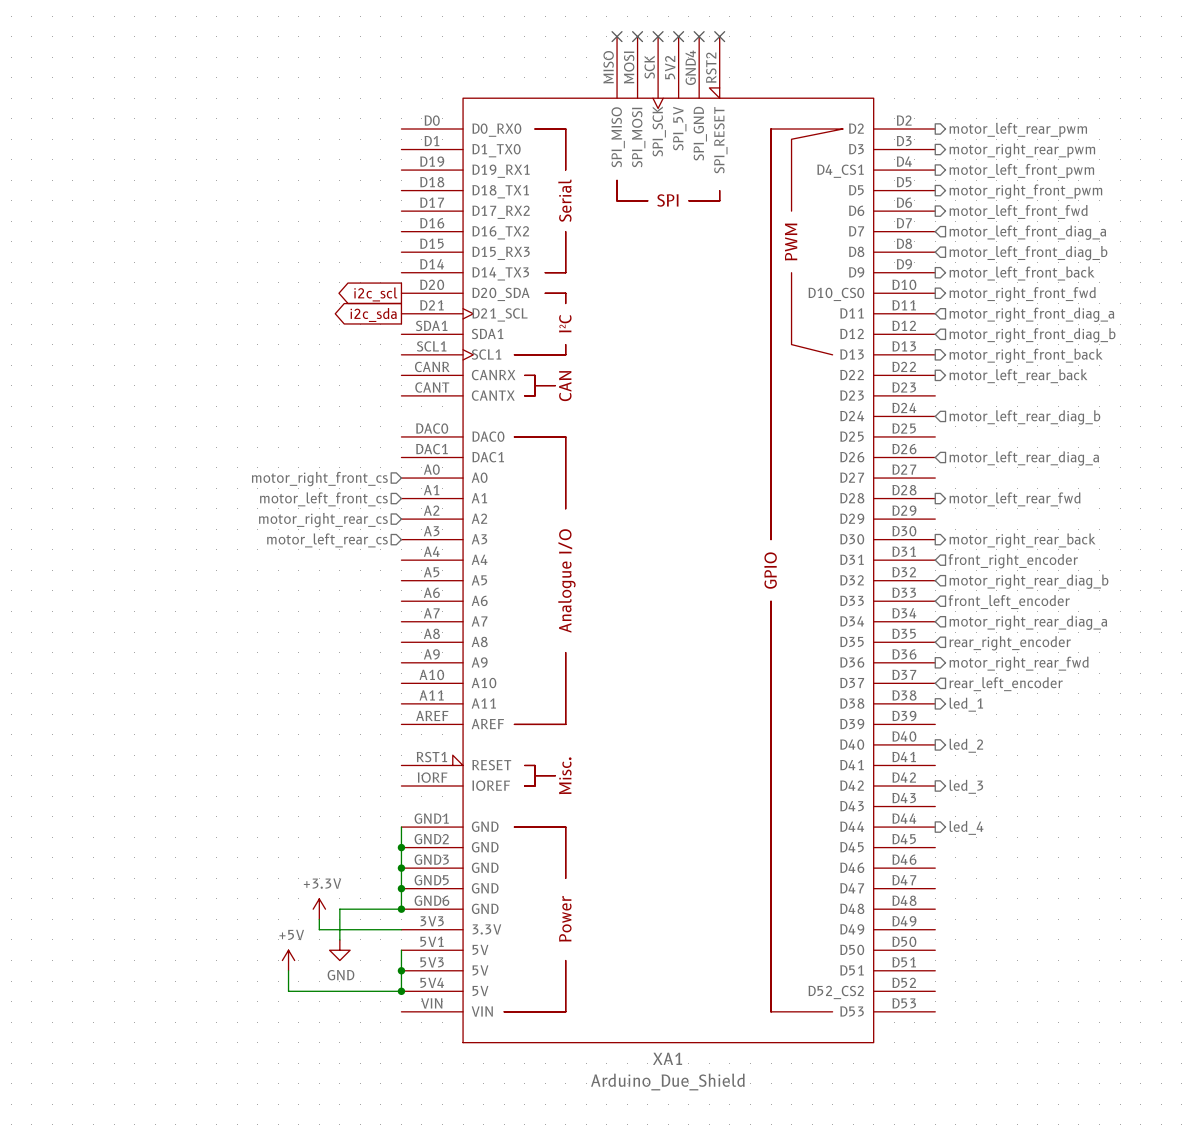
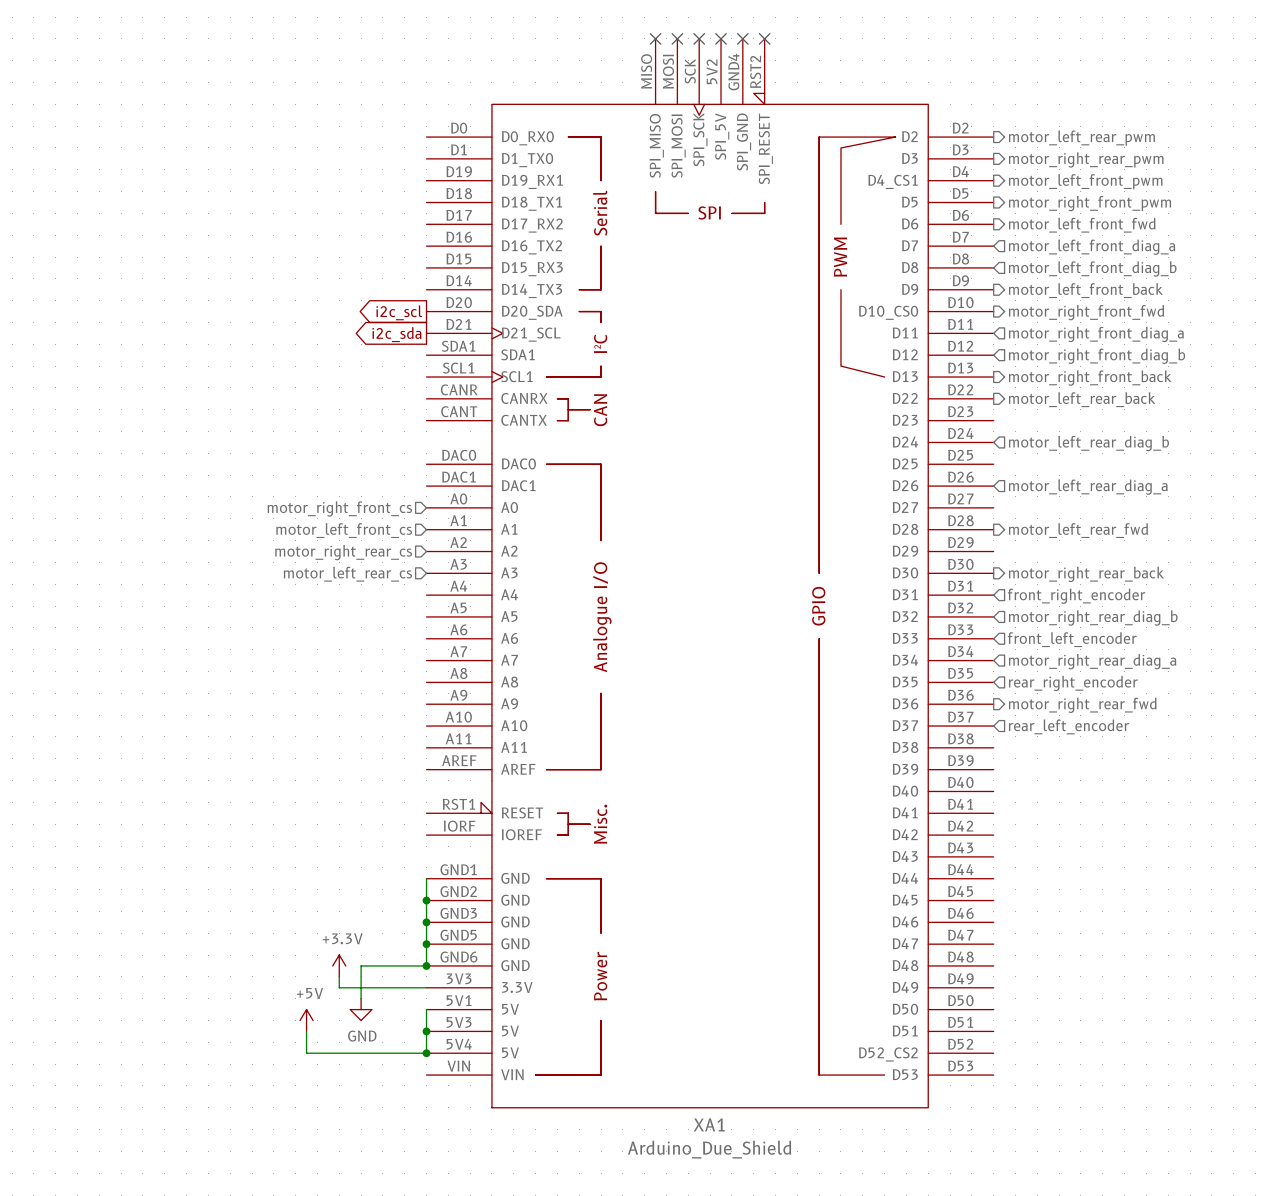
hierarchical label: led_1 (966, 704) -> none
hierarchical label: led_2 (966, 745) -> none
hierarchical label: led_3 (966, 786) -> none
hierarchical label: led_4 (966, 827) -> none

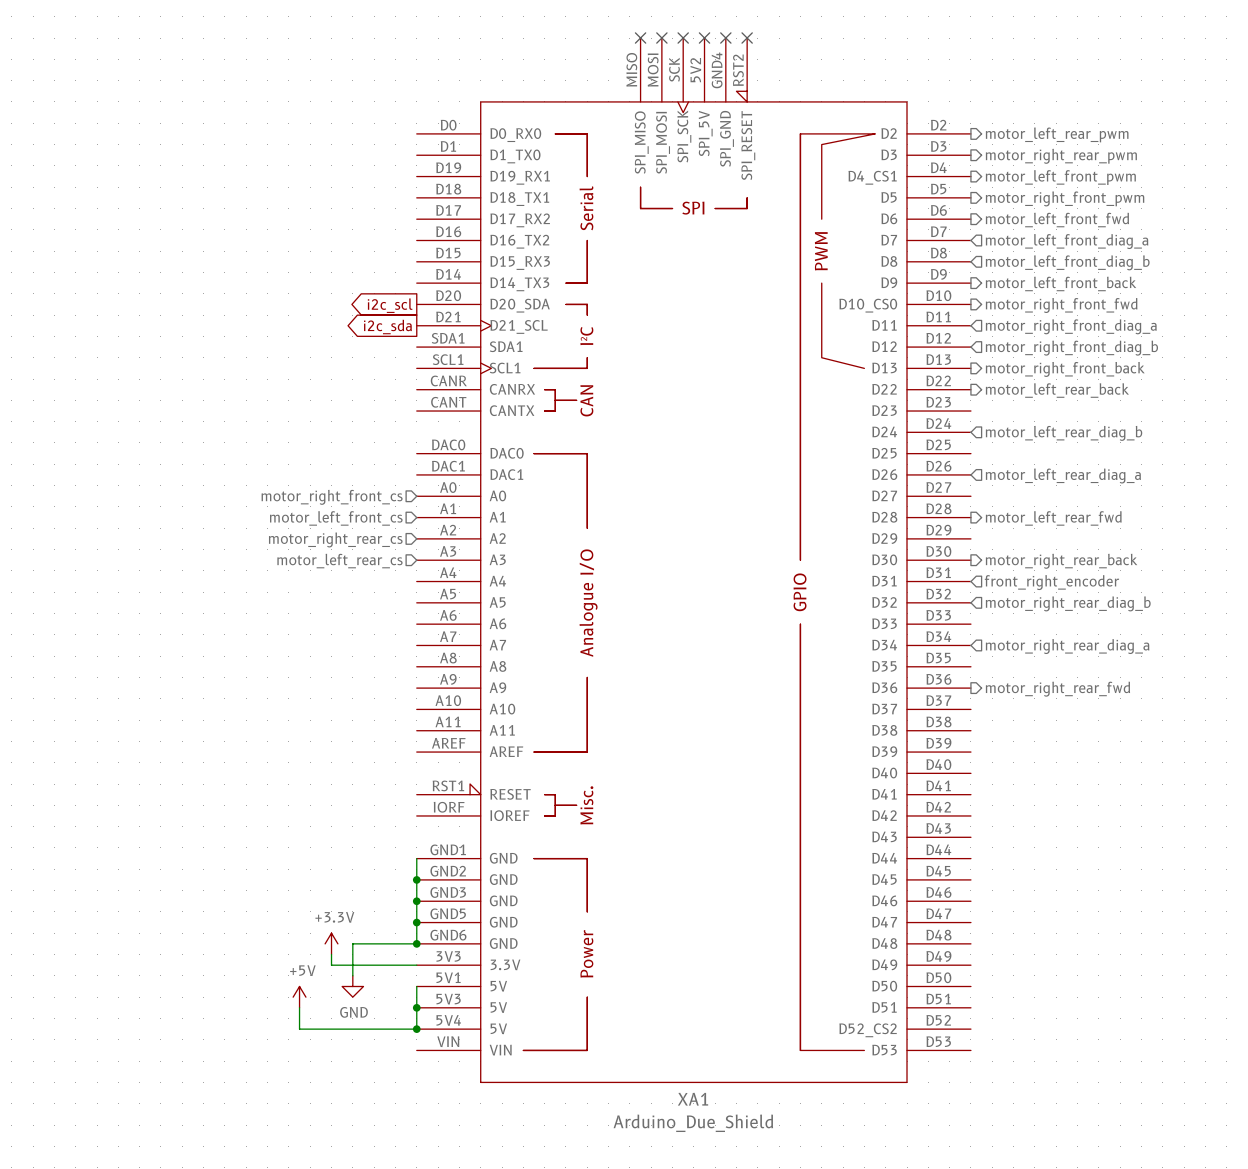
hierarchical label: front_left_encoder (1072, 639) -> none
hierarchical label: rear_right_encoder (1073, 683) -> none
hierarchical label: rear_left_encoder (1069, 726) -> none

